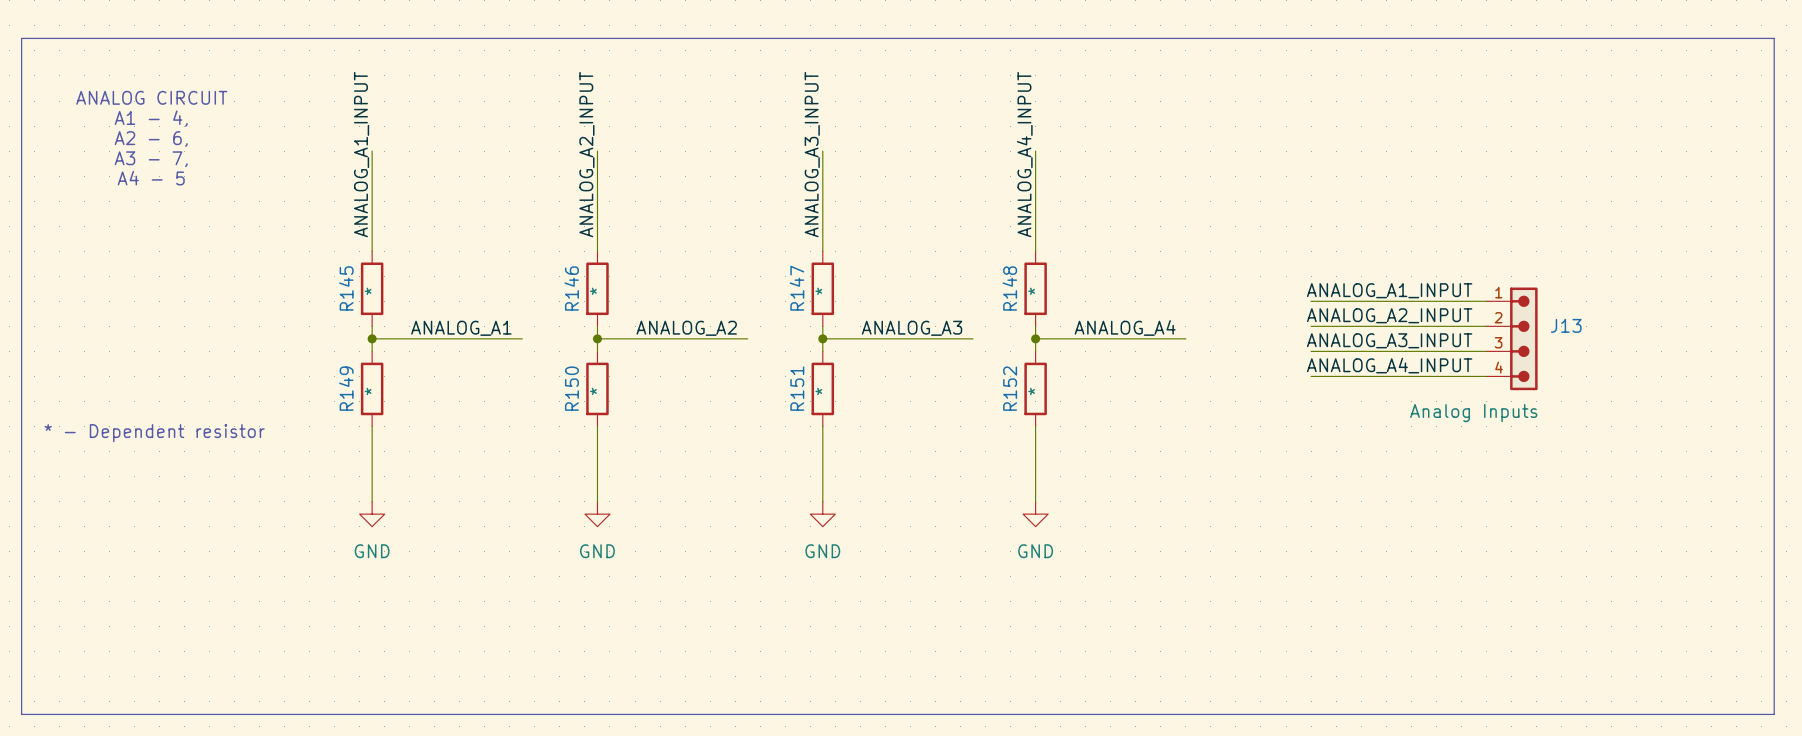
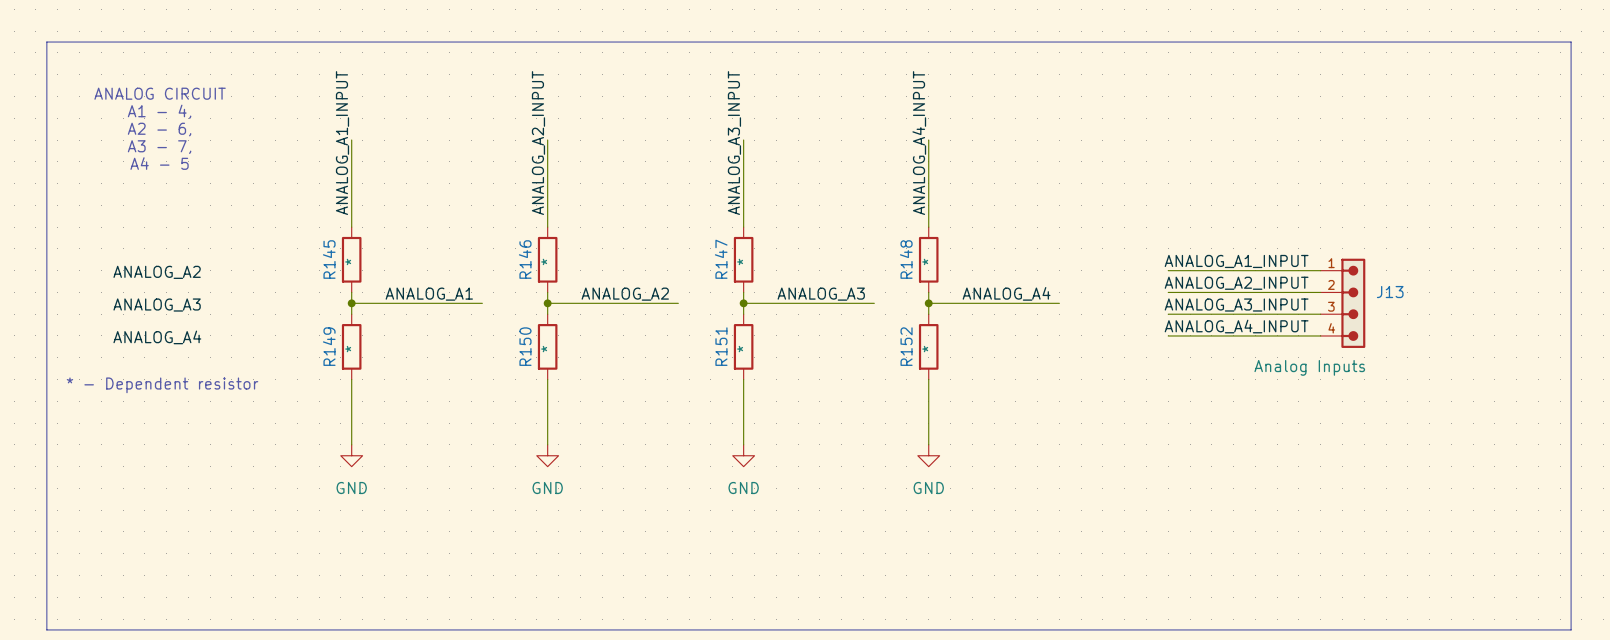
label: none -> ANALOG_A2 (157, 272)
label: none -> ANALOG_A3 (157, 305)
label: none -> ANALOG_A4 (157, 337)

